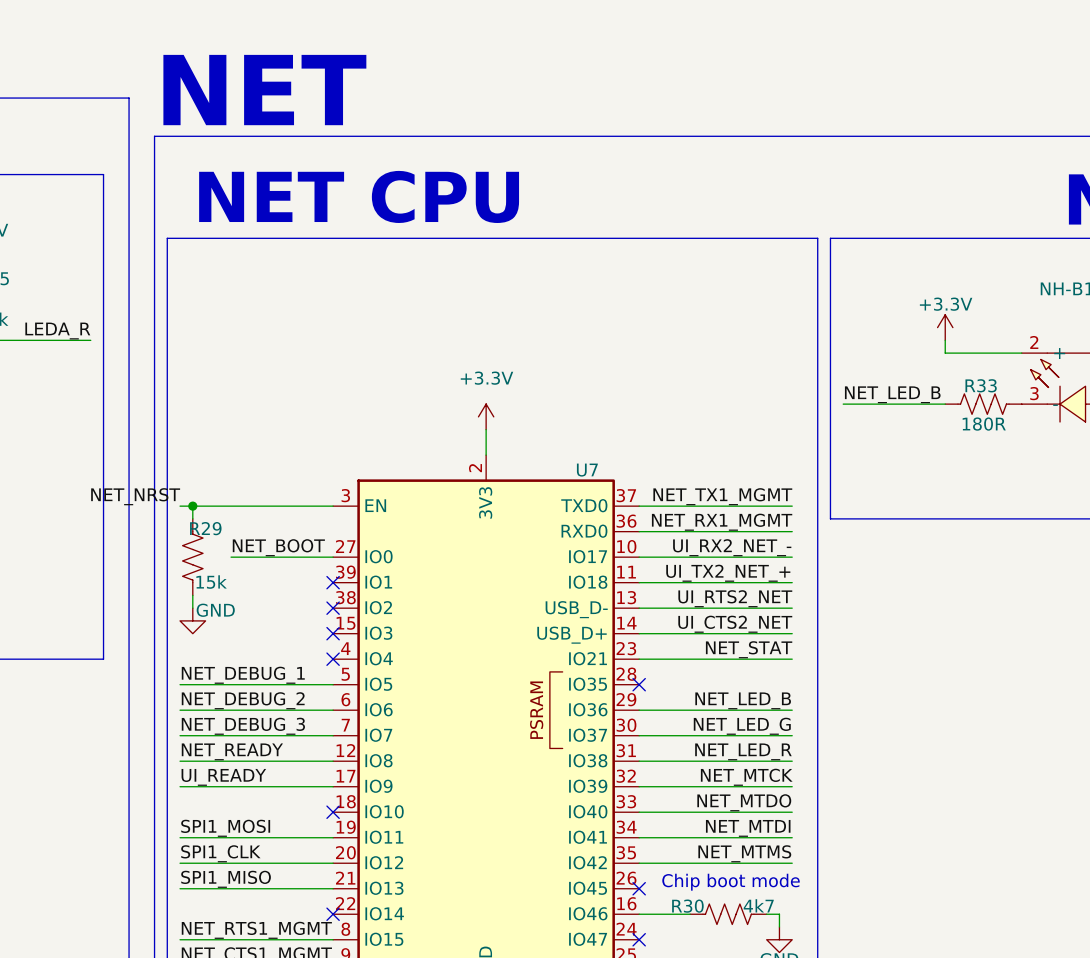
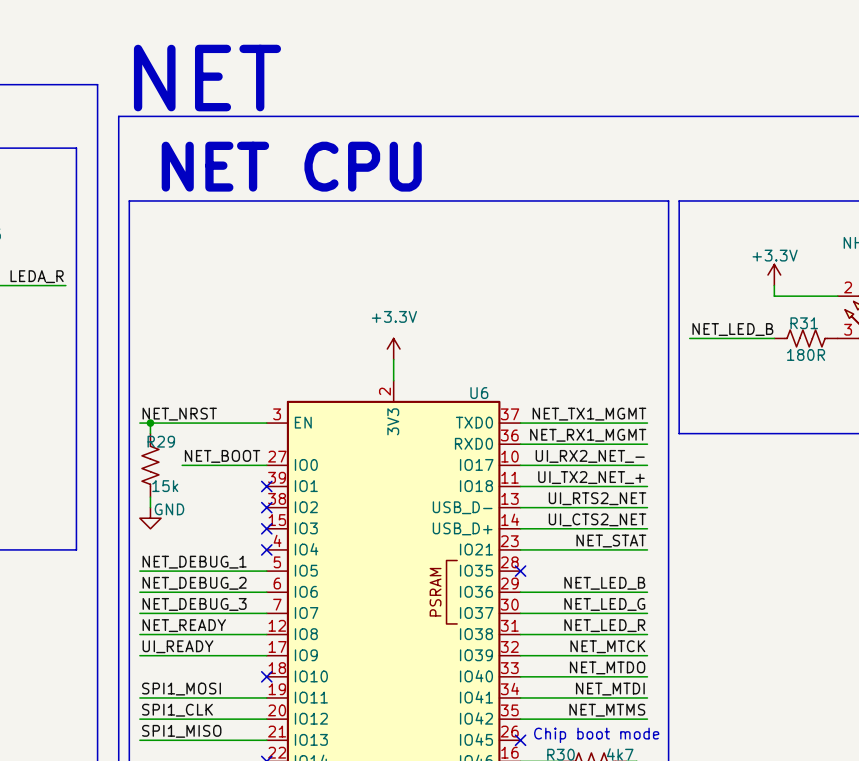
R33 name: R33 (981, 385) -> R31 (804, 323)
U7 name: U7 (587, 470) -> U6 (479, 393)
label position: NET_NRST (135, 496) -> NET_NRST (179, 414)

